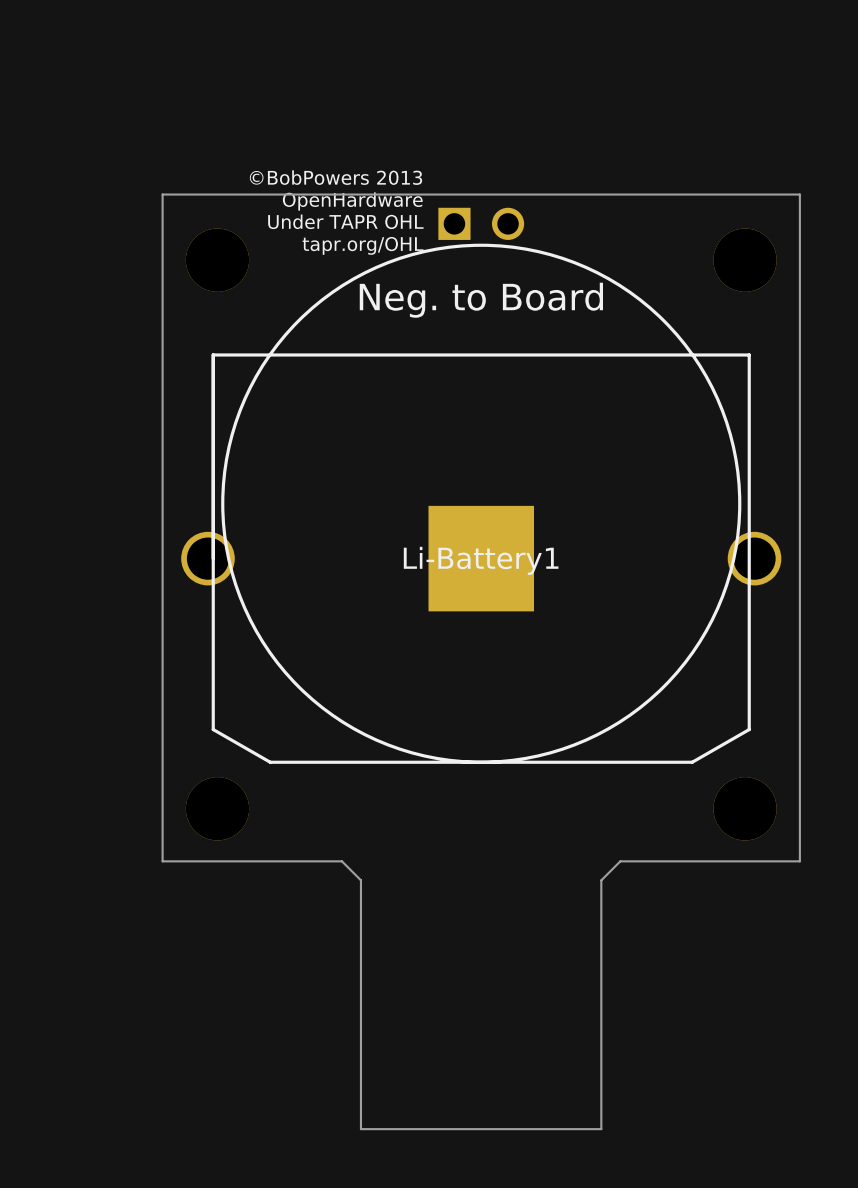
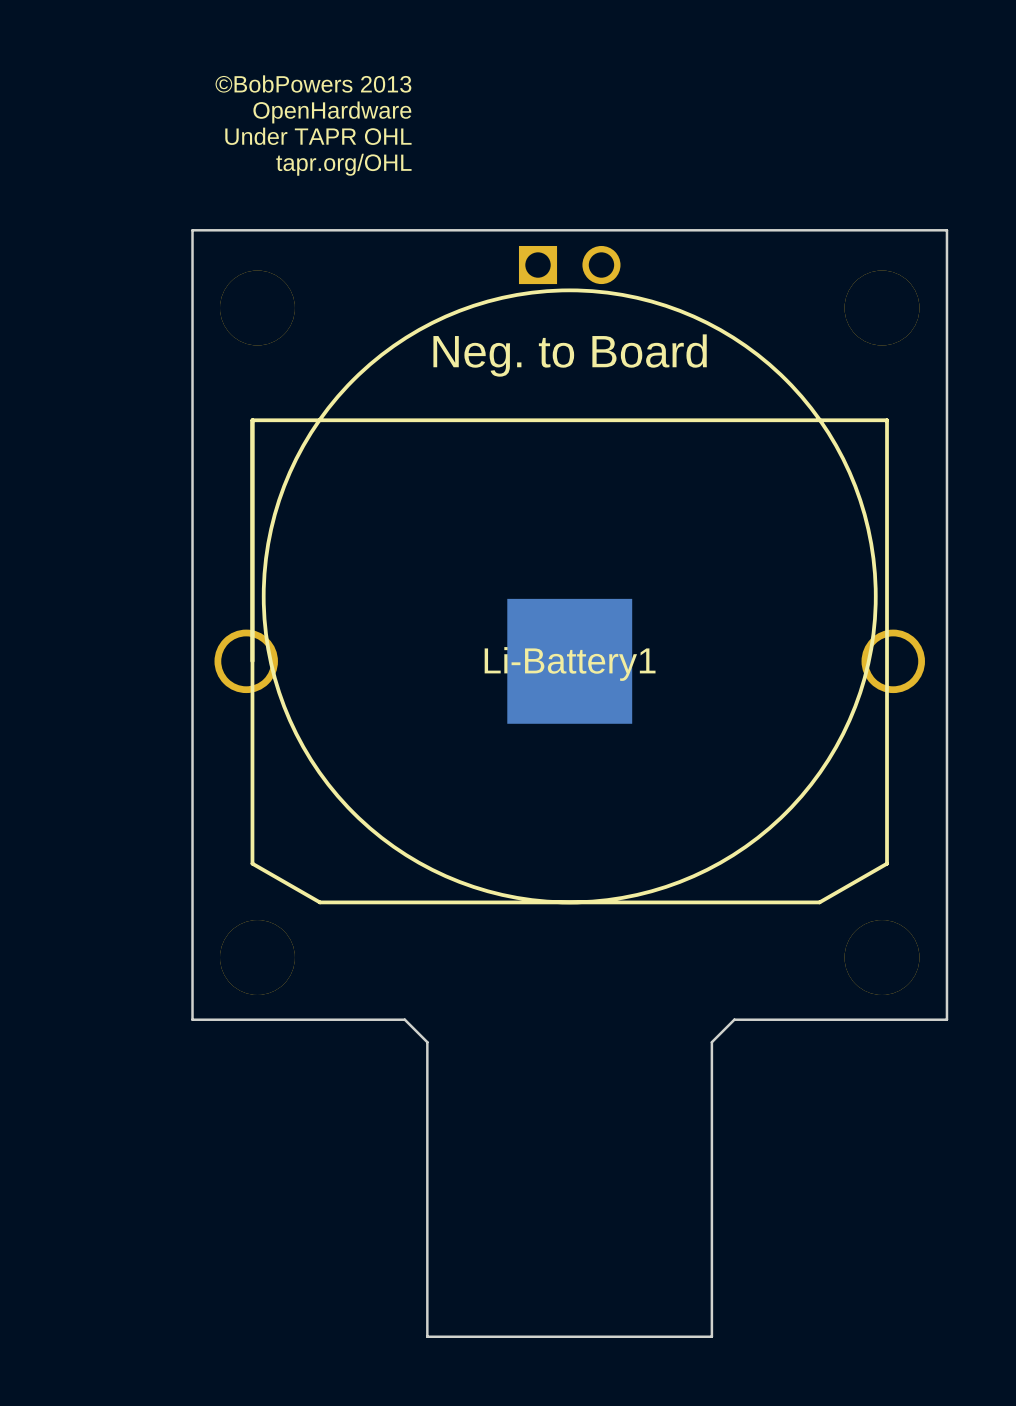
text position: ©BobPowers 2013 (335, 177) -> ©BobPowers 2013 (313, 83)
text position: OpenHardware (352, 201) -> OpenHardware (332, 112)
text position: Under TAPR OHL (345, 221) -> Under TAPR OHL (318, 136)
text position: tapr.org/OHL (363, 245) -> tapr.org/OHL (343, 164)

